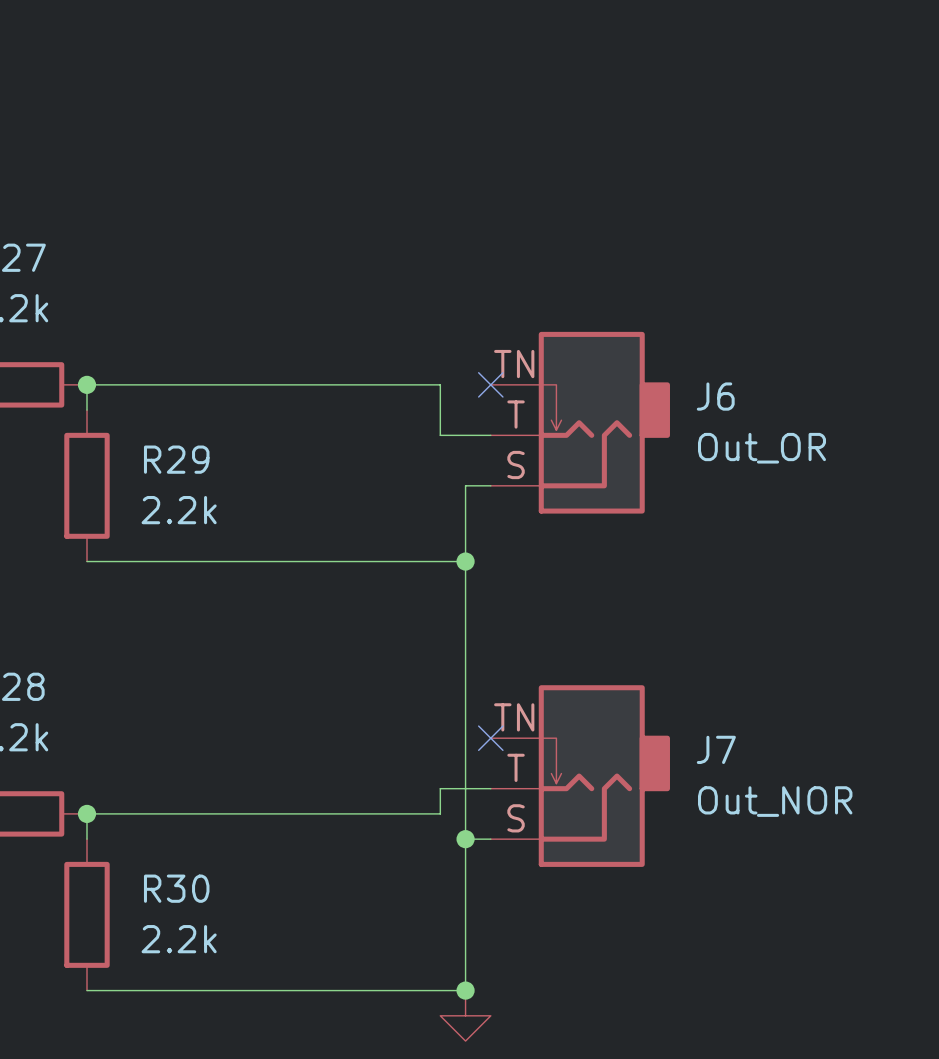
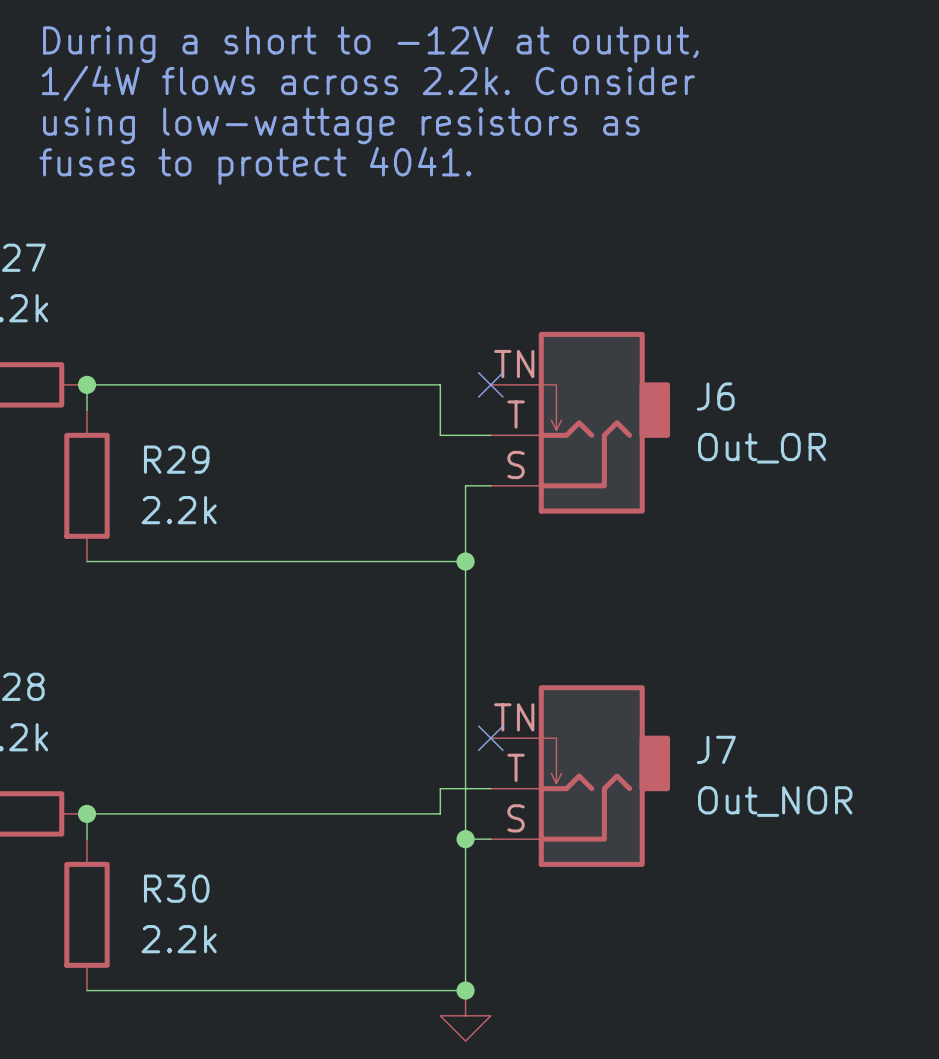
text: none -> During a short to -12V at output, (370, 44)
text: none -> 1/4W flows across 2.2k. Consider (368, 83)
text: none -> using low-wattage resistors as (341, 125)
text: none -> fuses to protect 4041. (255, 165)

